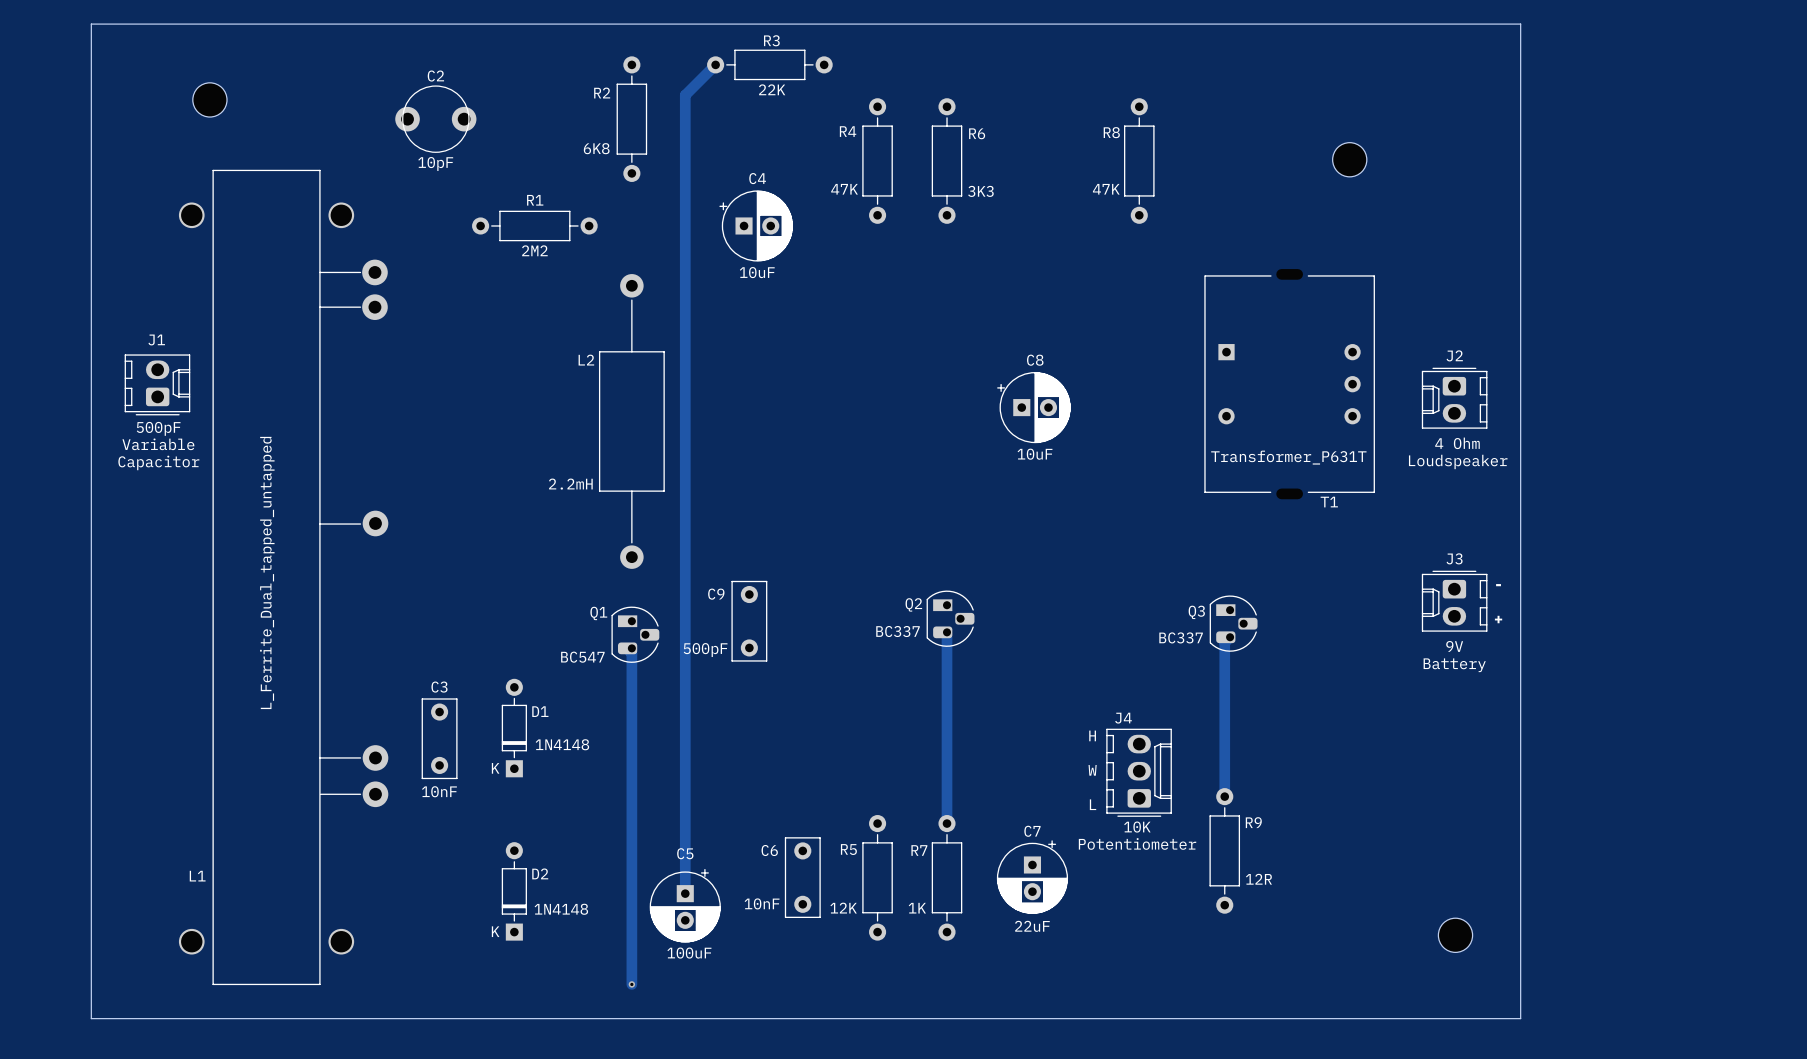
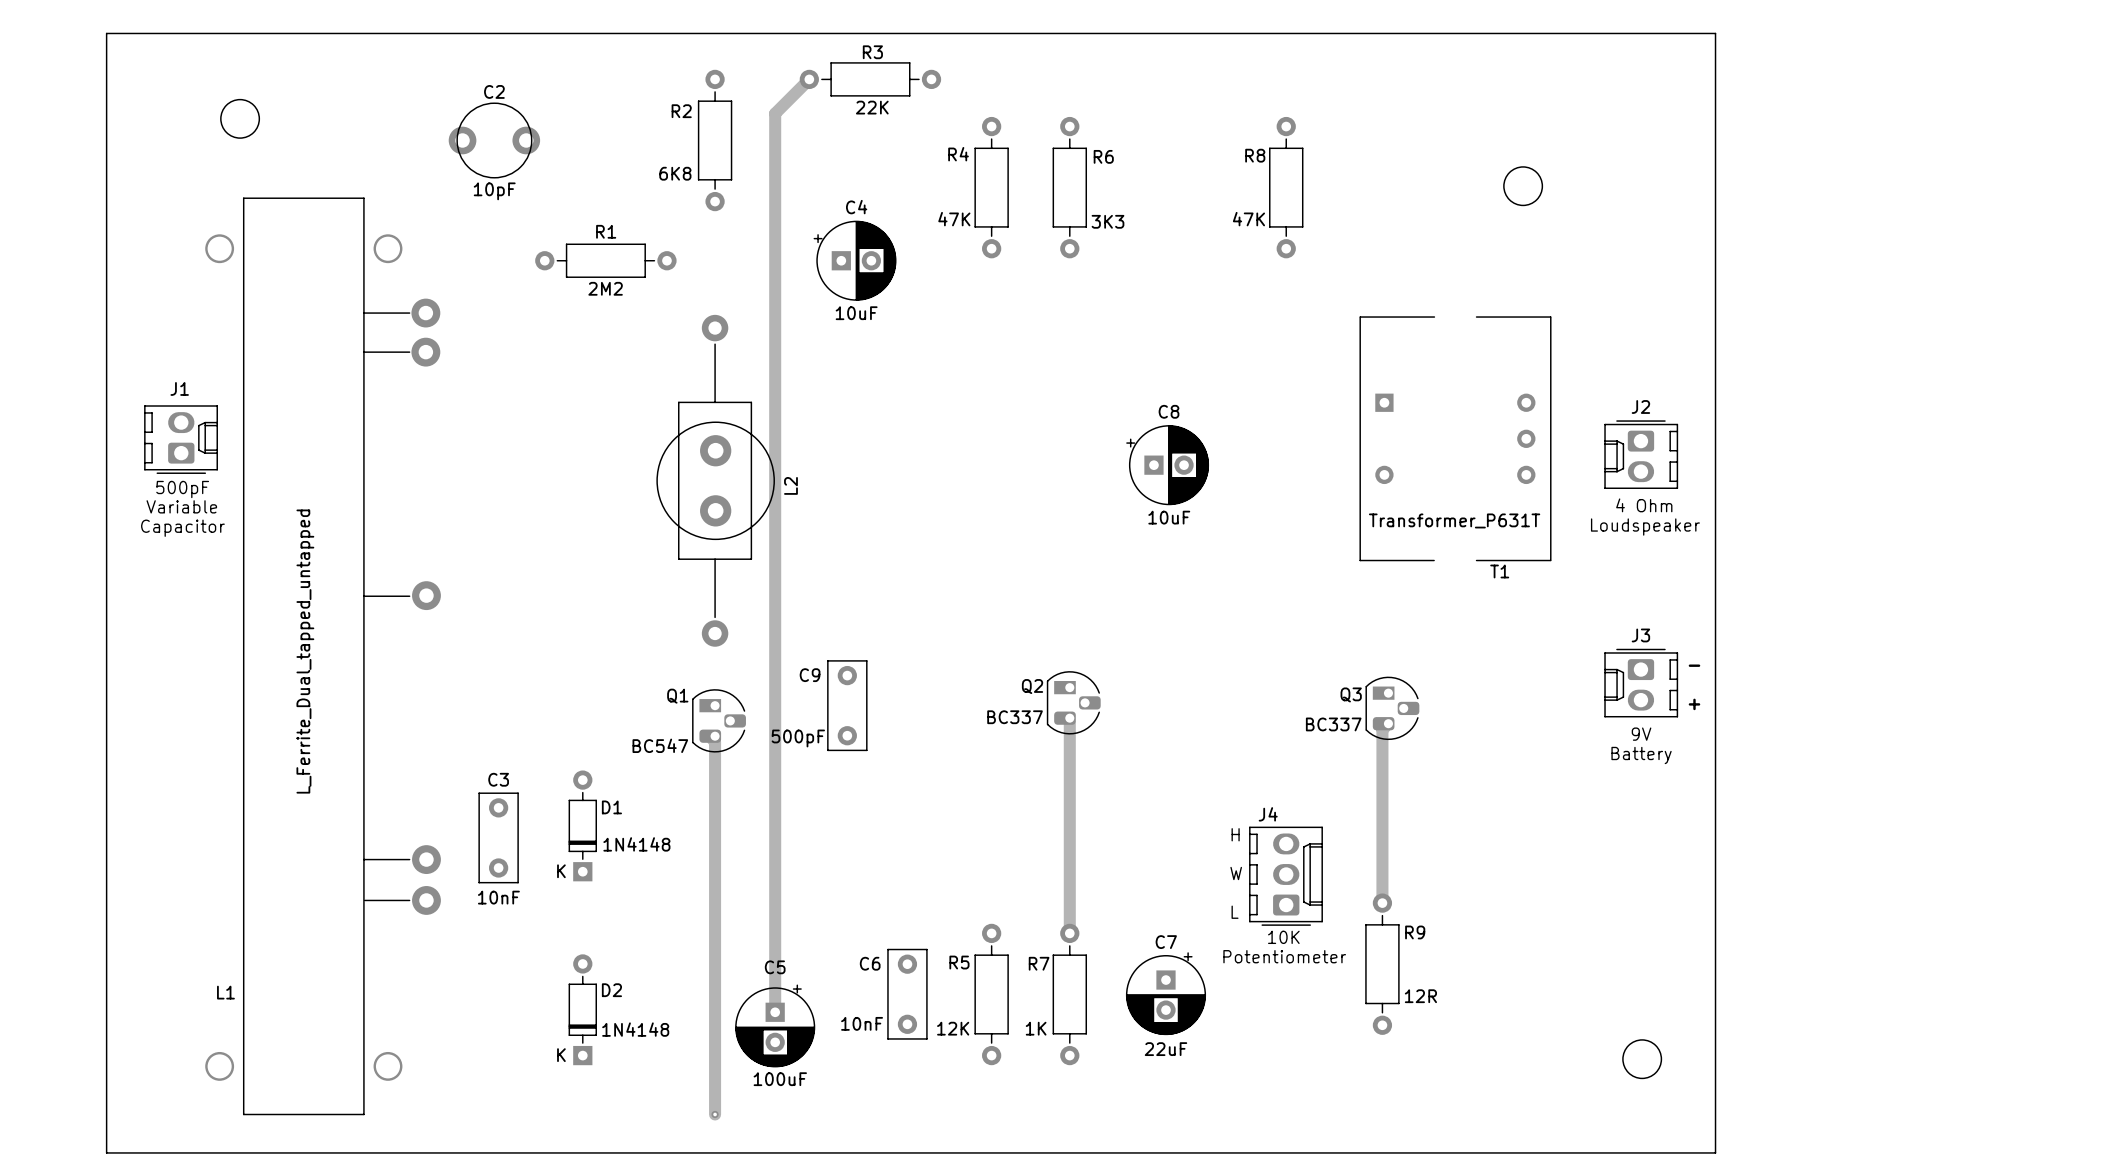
L2 footprint: [598, 274, 665, 569] -> [656, 314, 775, 647]
L2 name position: L2 (586, 360) -> L2 (790, 485)
L2 value: 2.2mH (570, 484) -> none

